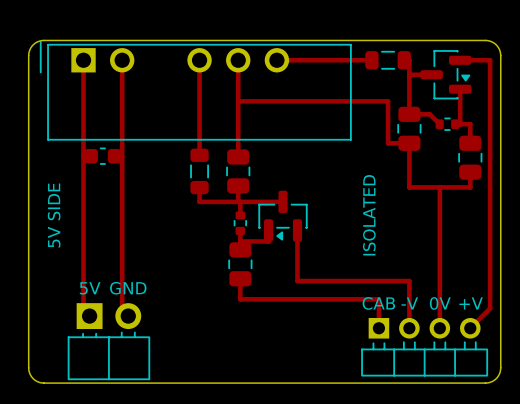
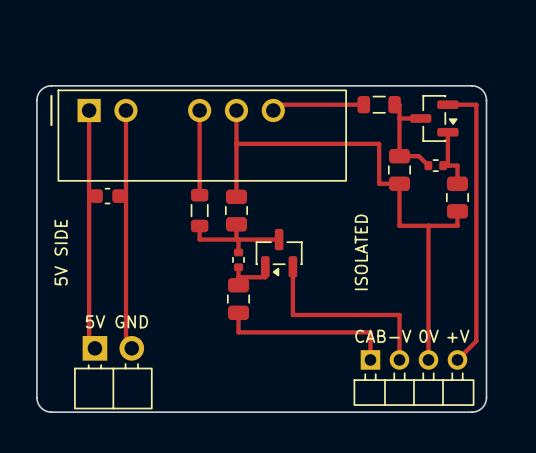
part footprint: [39, 41, 352, 141] -> [50, 89, 347, 182]

